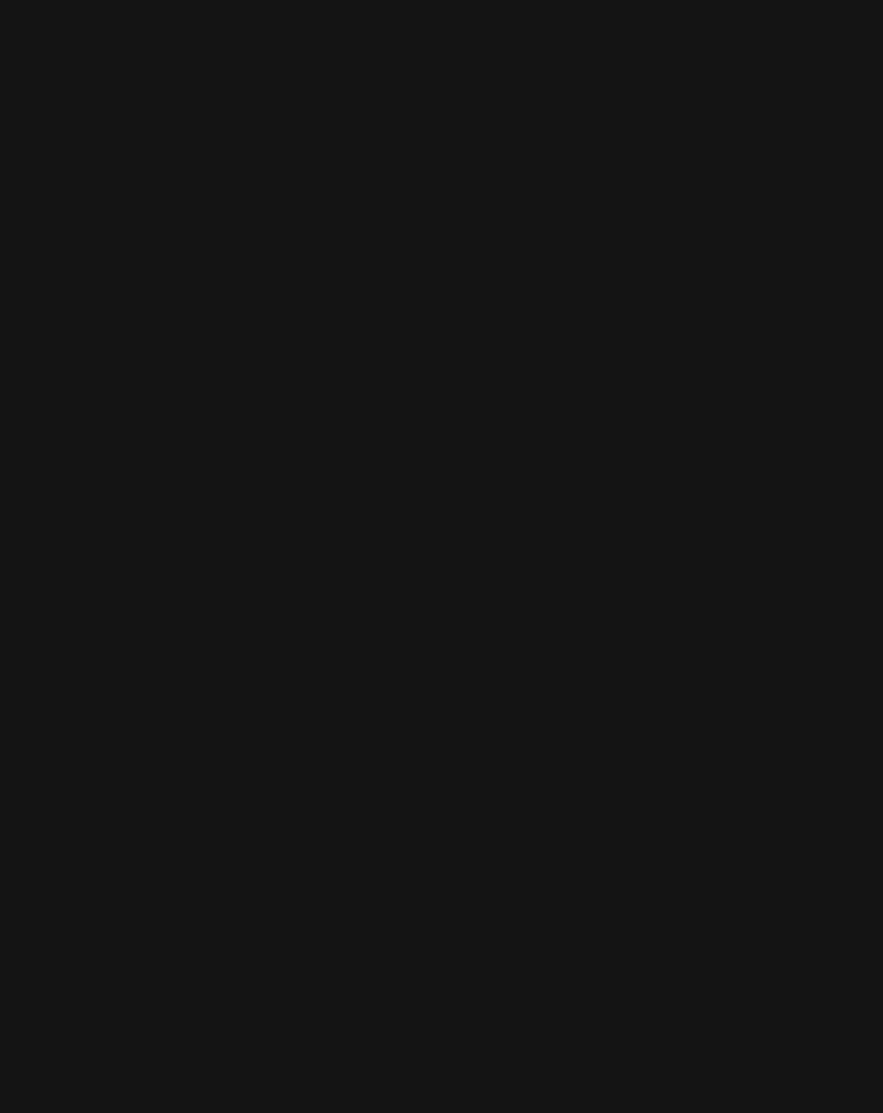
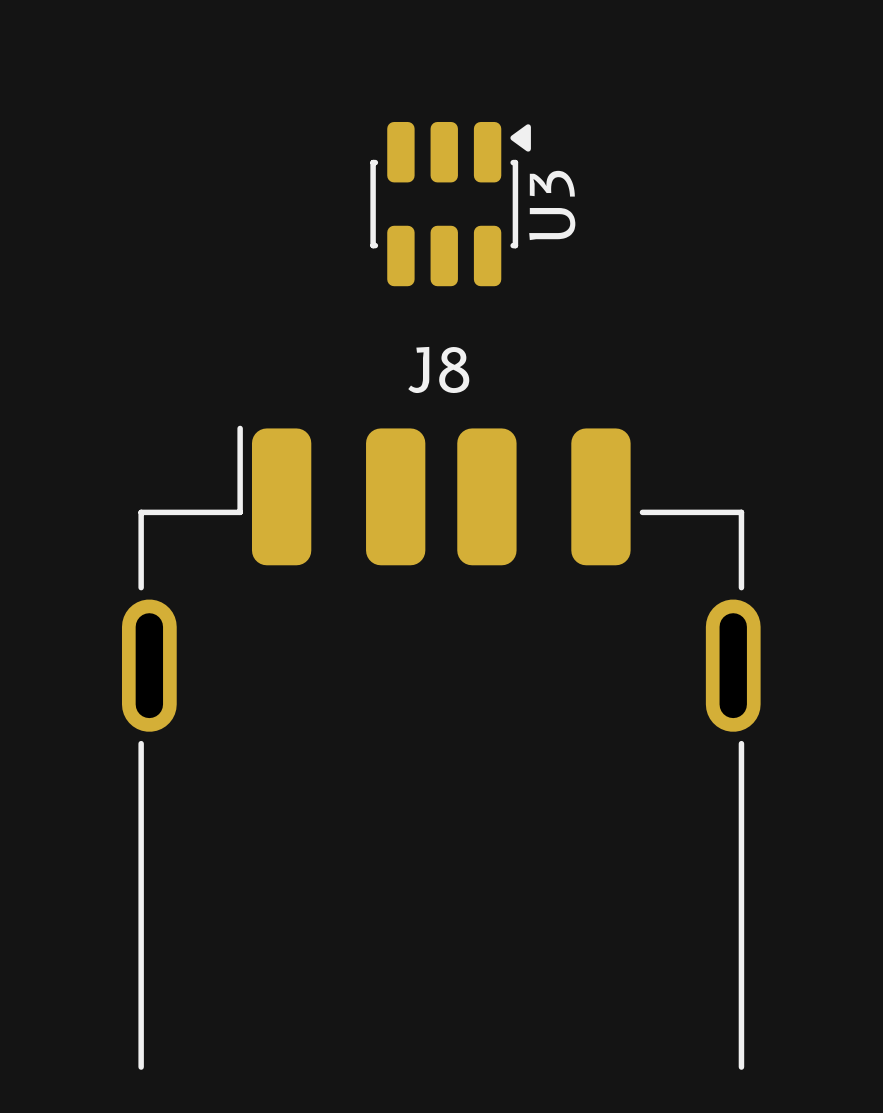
U3: none -> (450, 204)
J8: none -> (441, 747)

